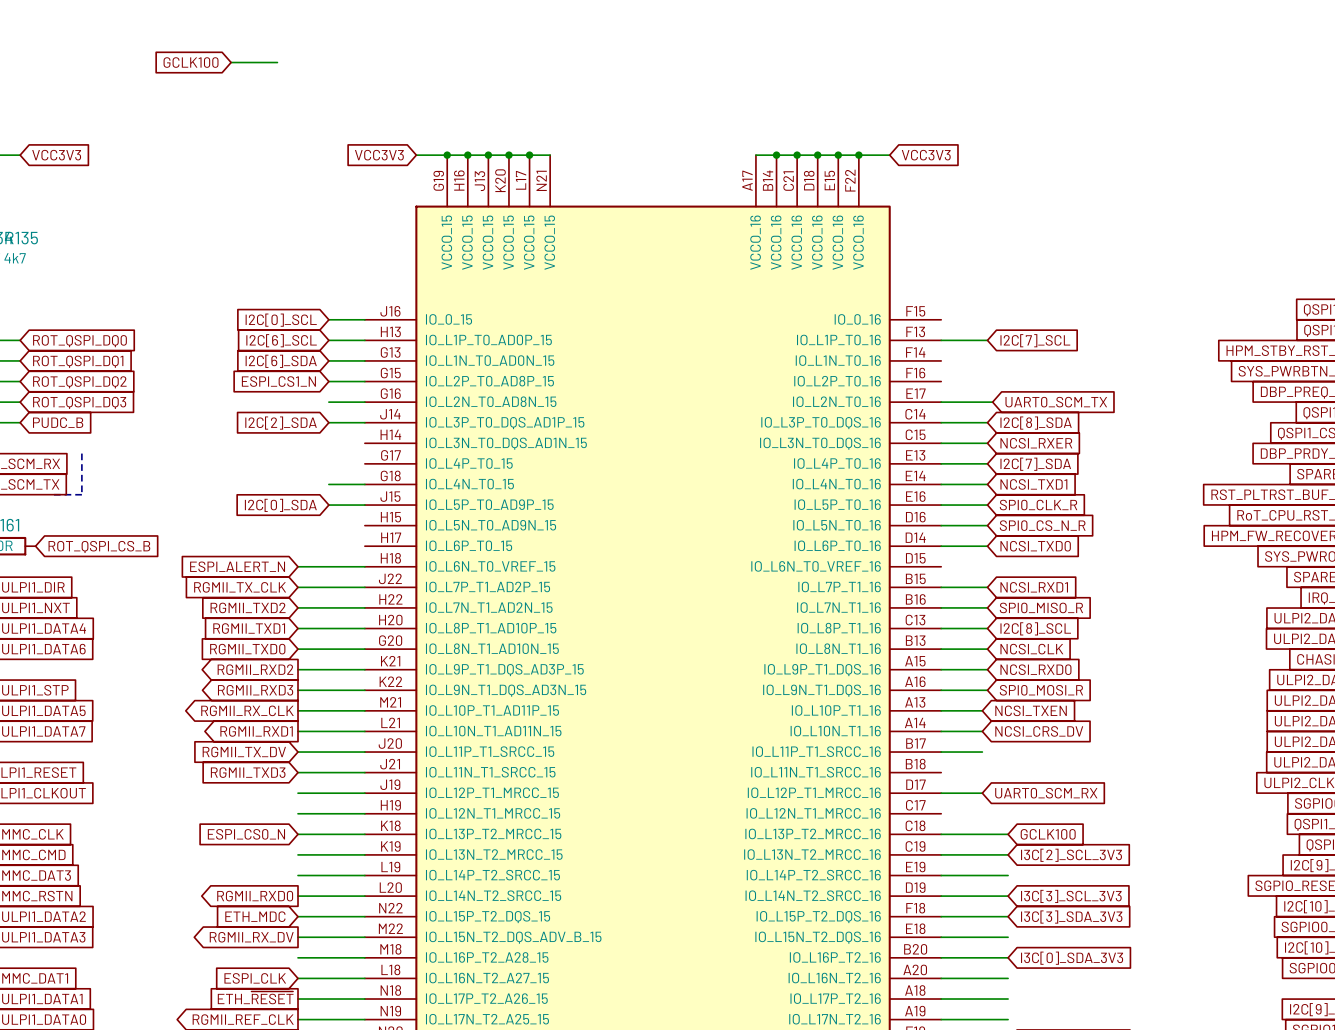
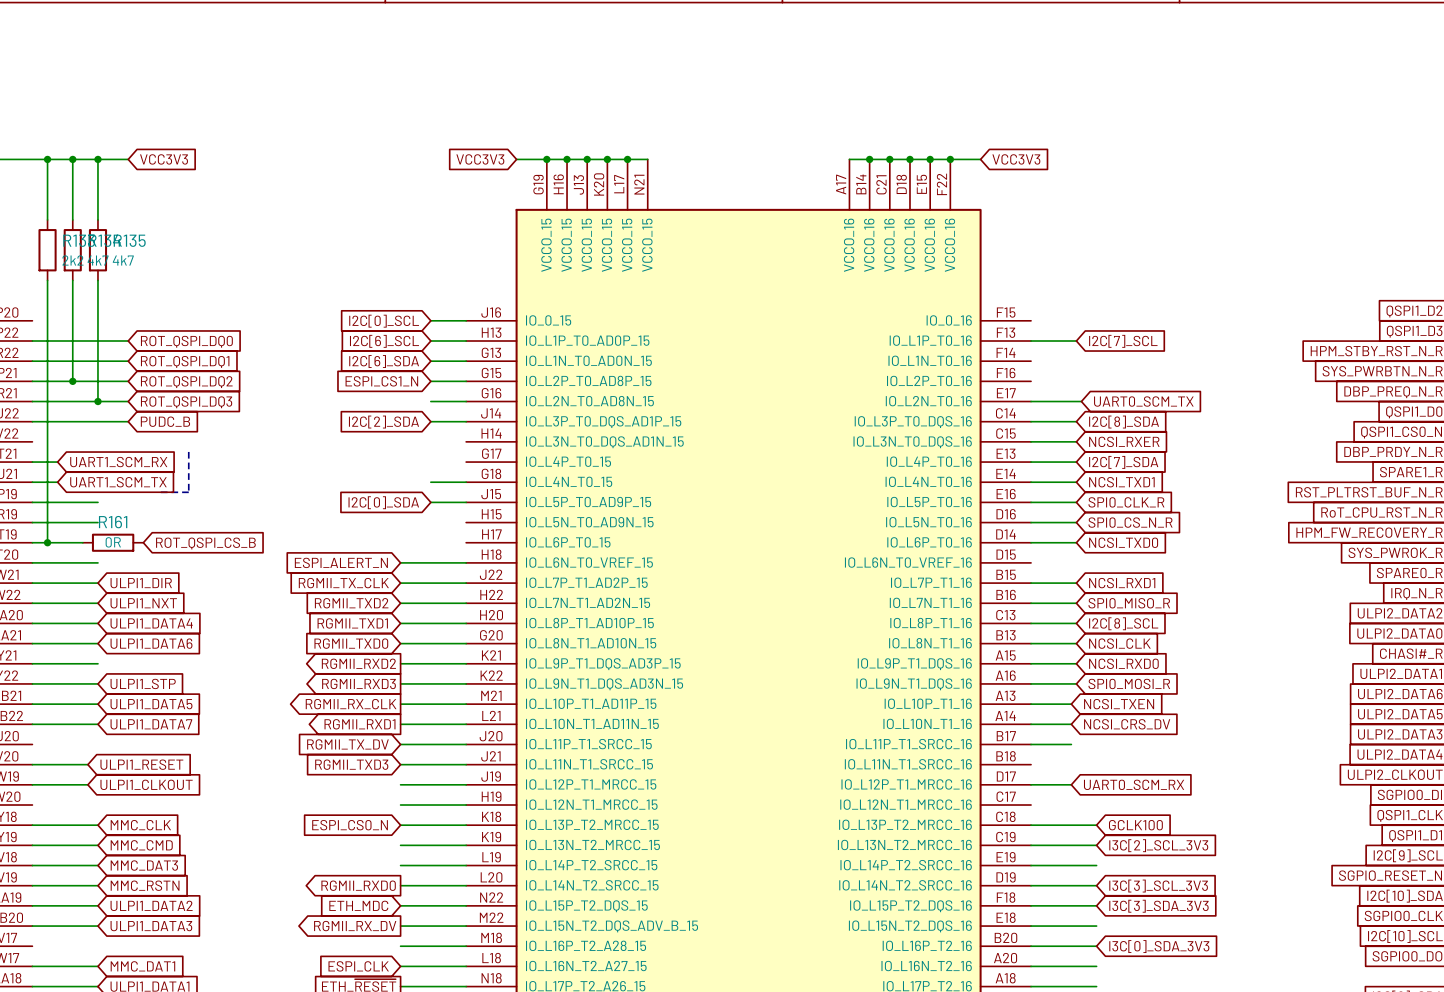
global label: GCLK100 (191, 62) -> none
wire: (231, 62) (277, 62) -> none

